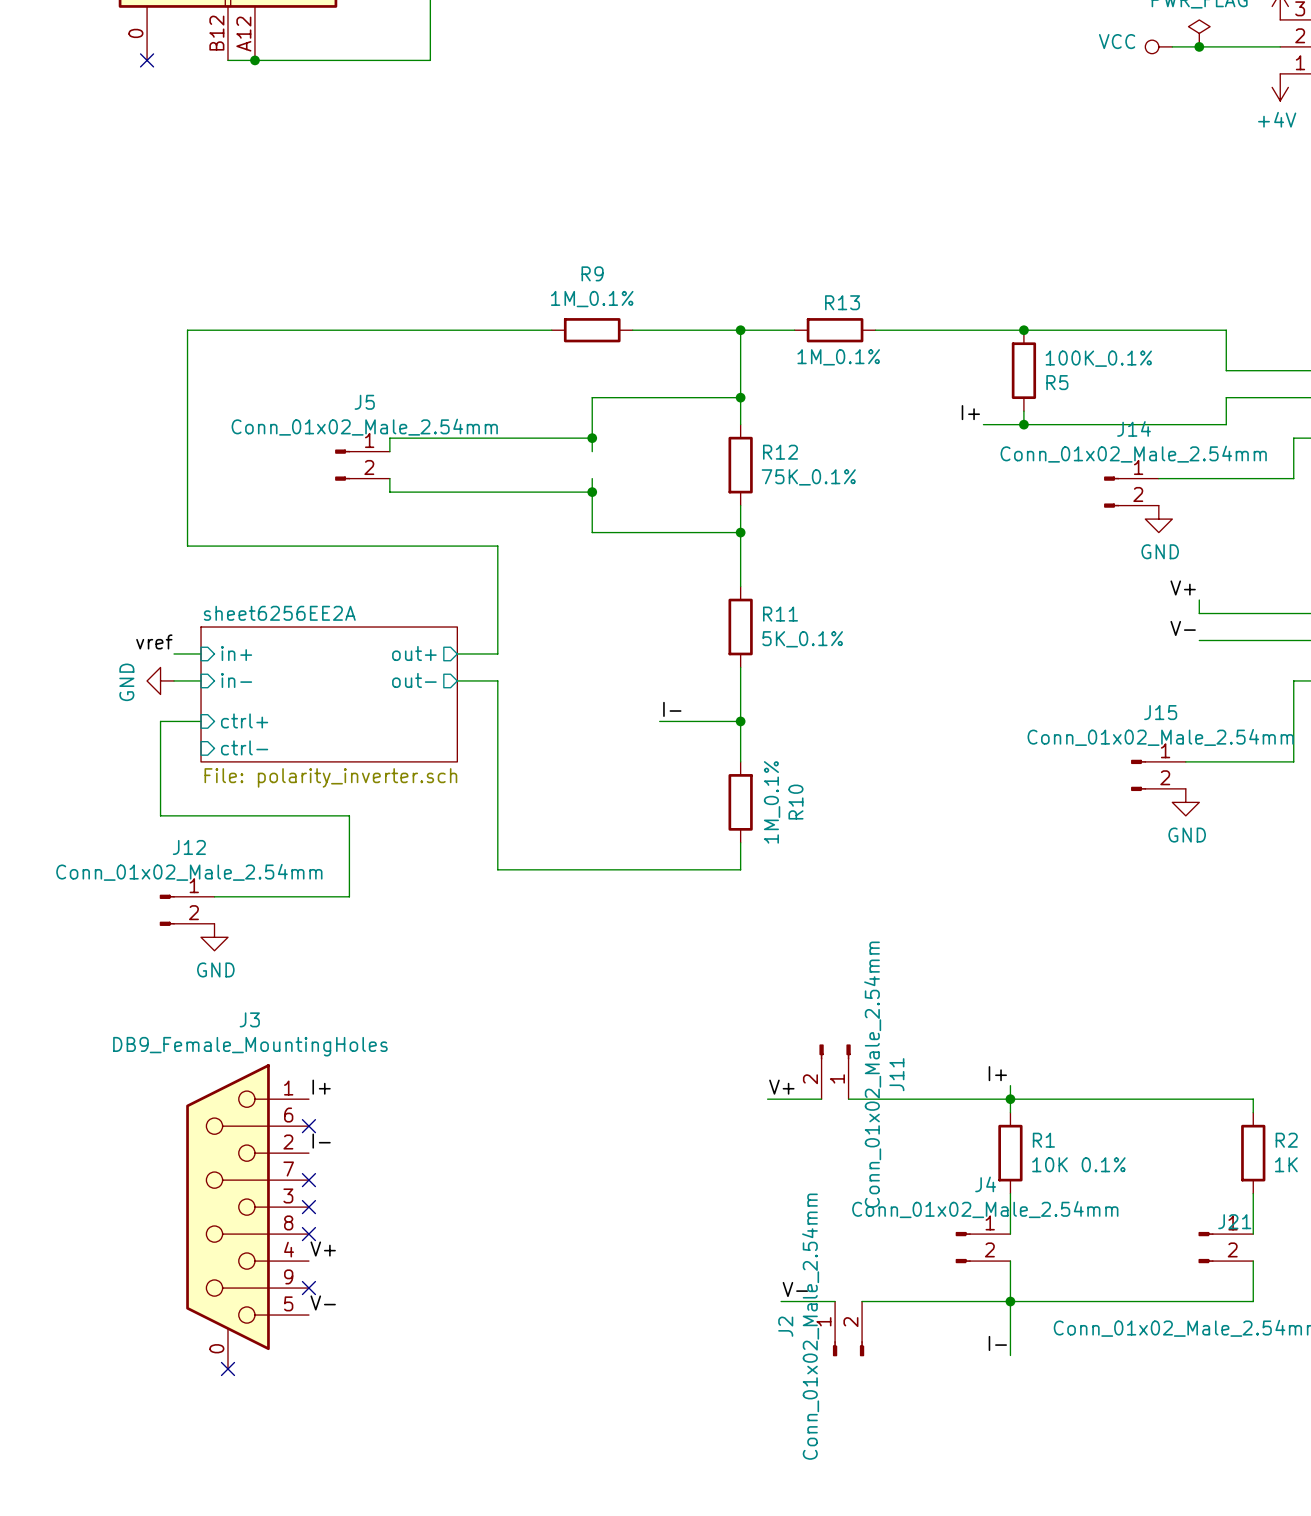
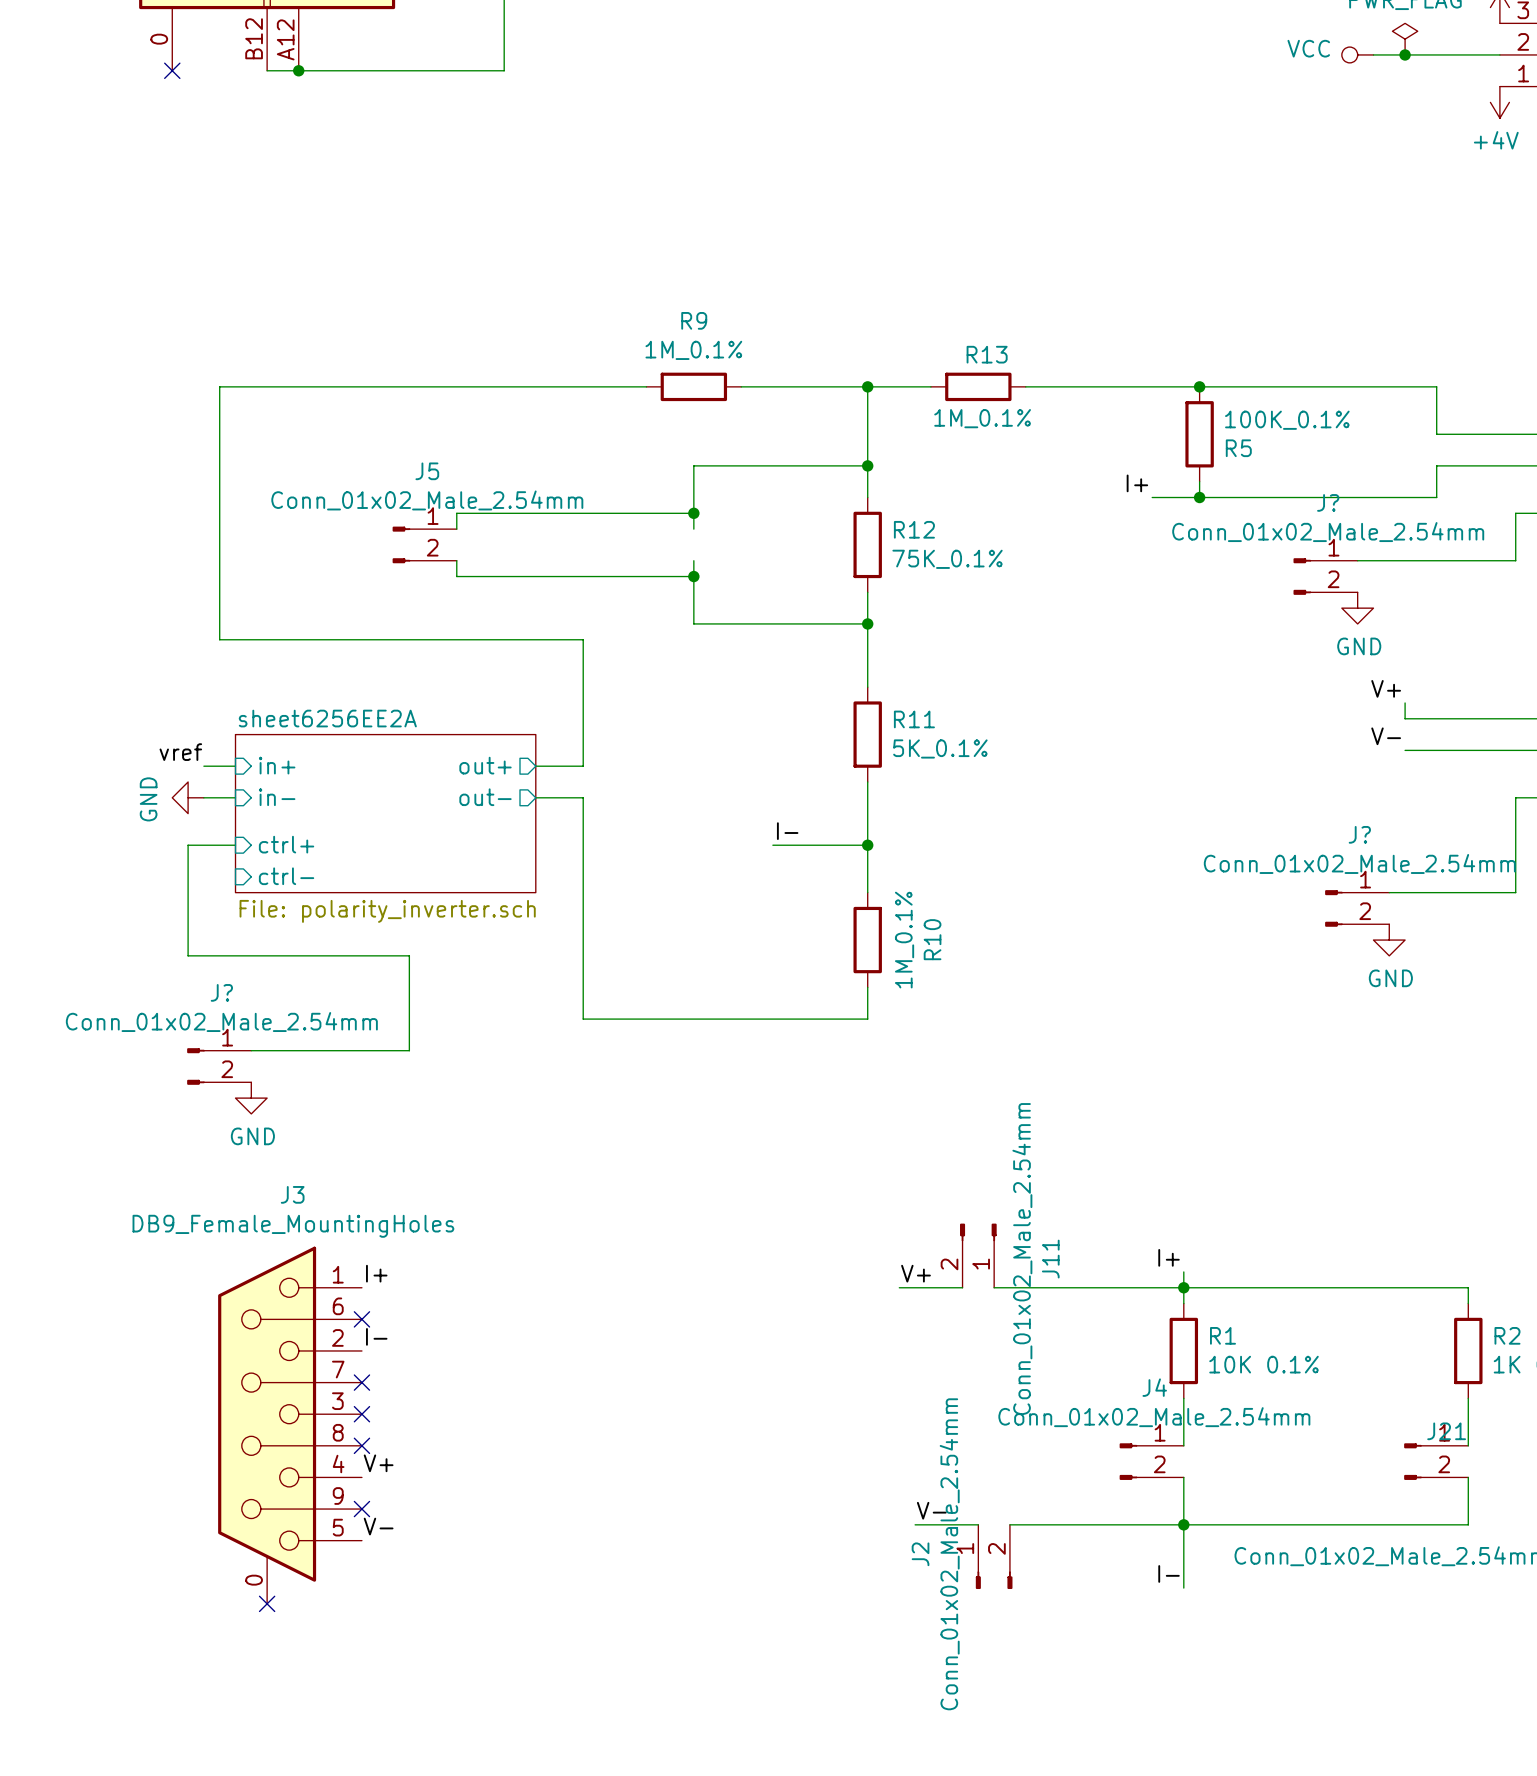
J14 name: J14 (1134, 428) -> J? (1328, 502)
J15 name: J15 (1160, 712) -> J? (1359, 834)
J12 name: J12 (189, 847) -> J? (221, 992)

